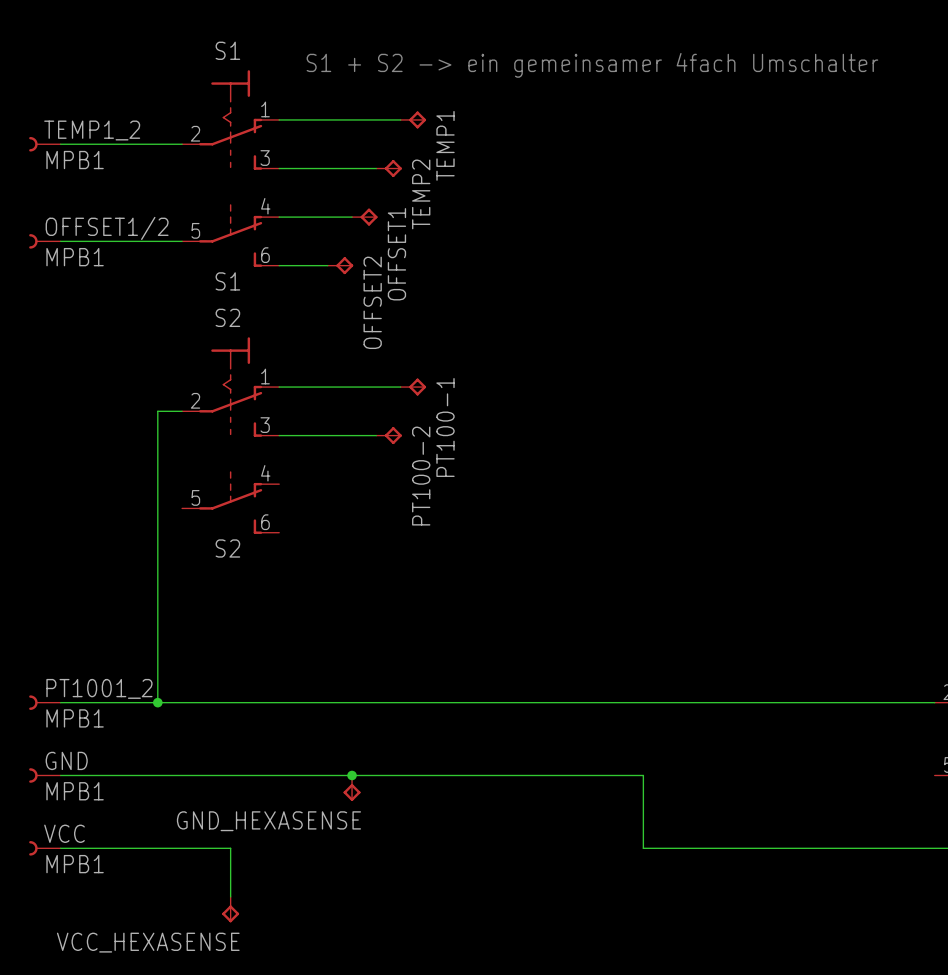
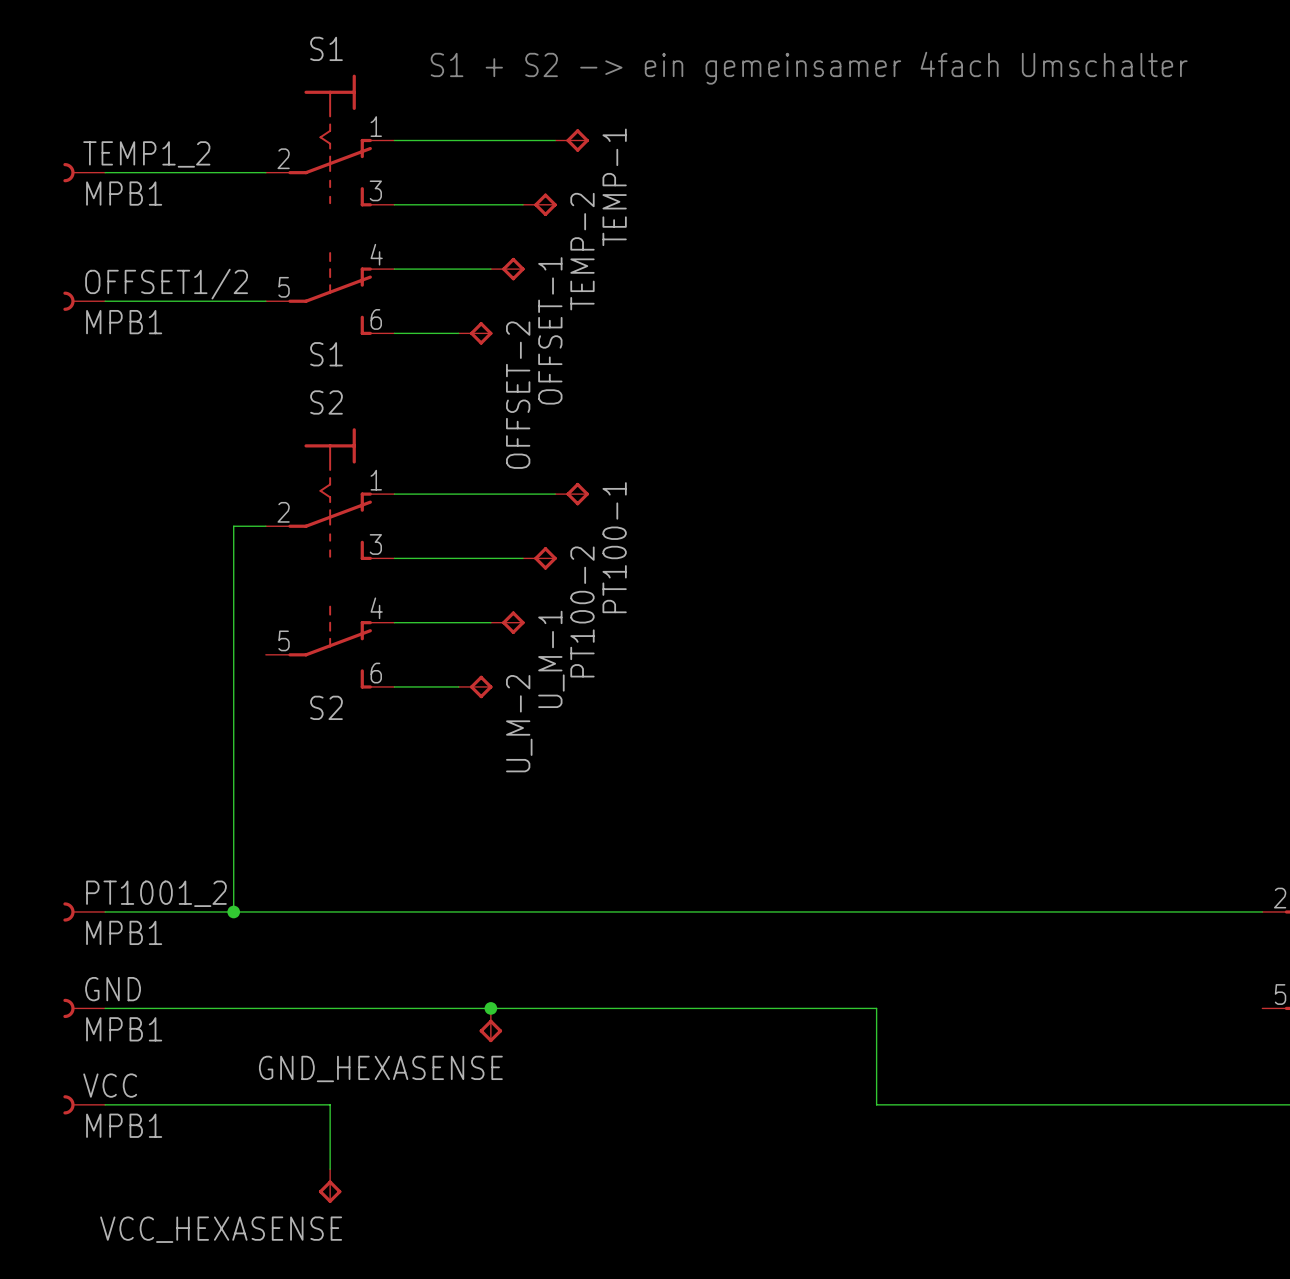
TEMP1 name: TEMP1 (445, 145) -> TEMP-1 (614, 187)
TEMP2 name: TEMP2 (421, 194) -> TEMP-2 (582, 251)
OFFSET1 name: OFFSET1 (396, 254) -> OFFSET-1 (550, 330)
OFFSET2 name: OFFSET2 (372, 302) -> OFFSET-2 (518, 395)
wire: none -> (394, 622) (490, 622)
U_M-1: none -> (507, 622)
wire: none -> (394, 686) (458, 686)
U_M-2: none -> (475, 686)

